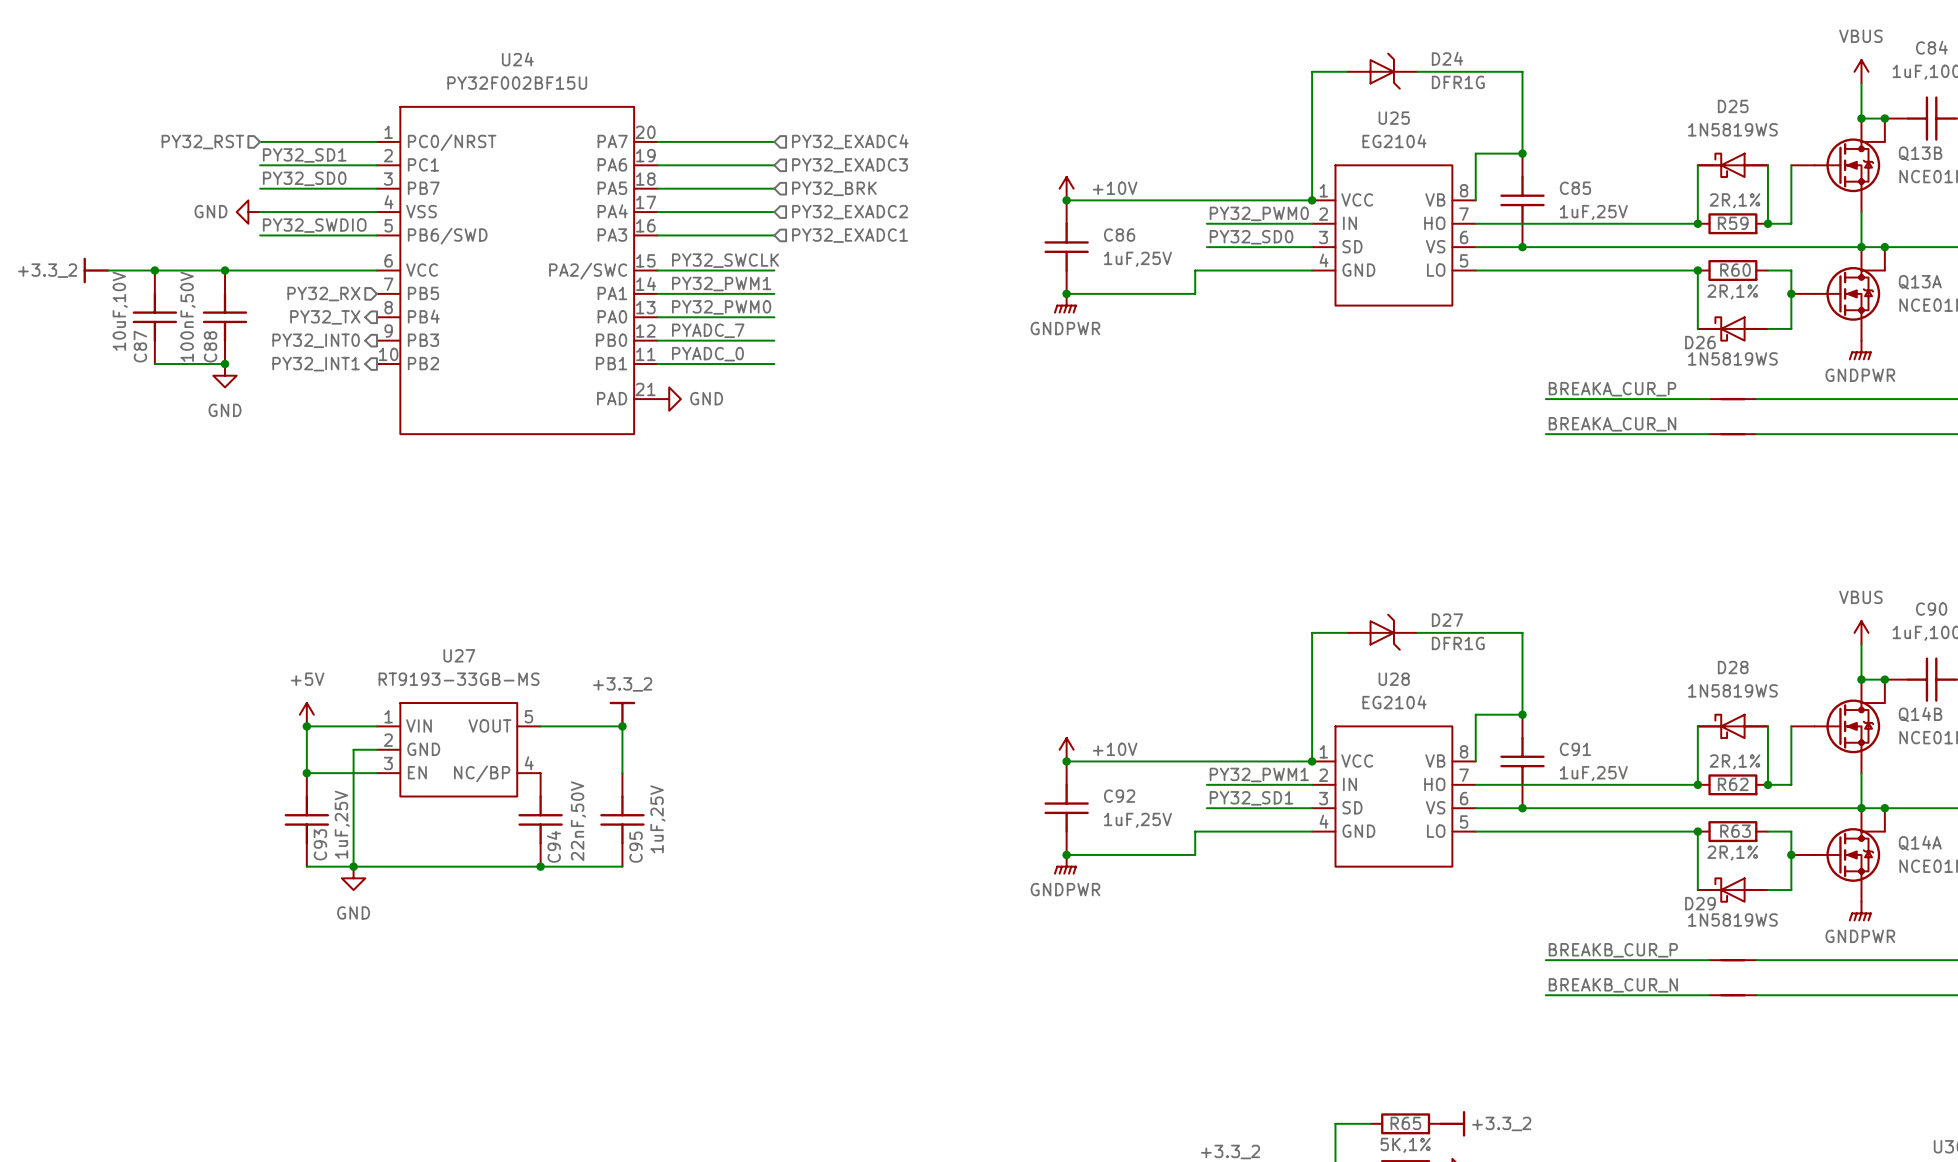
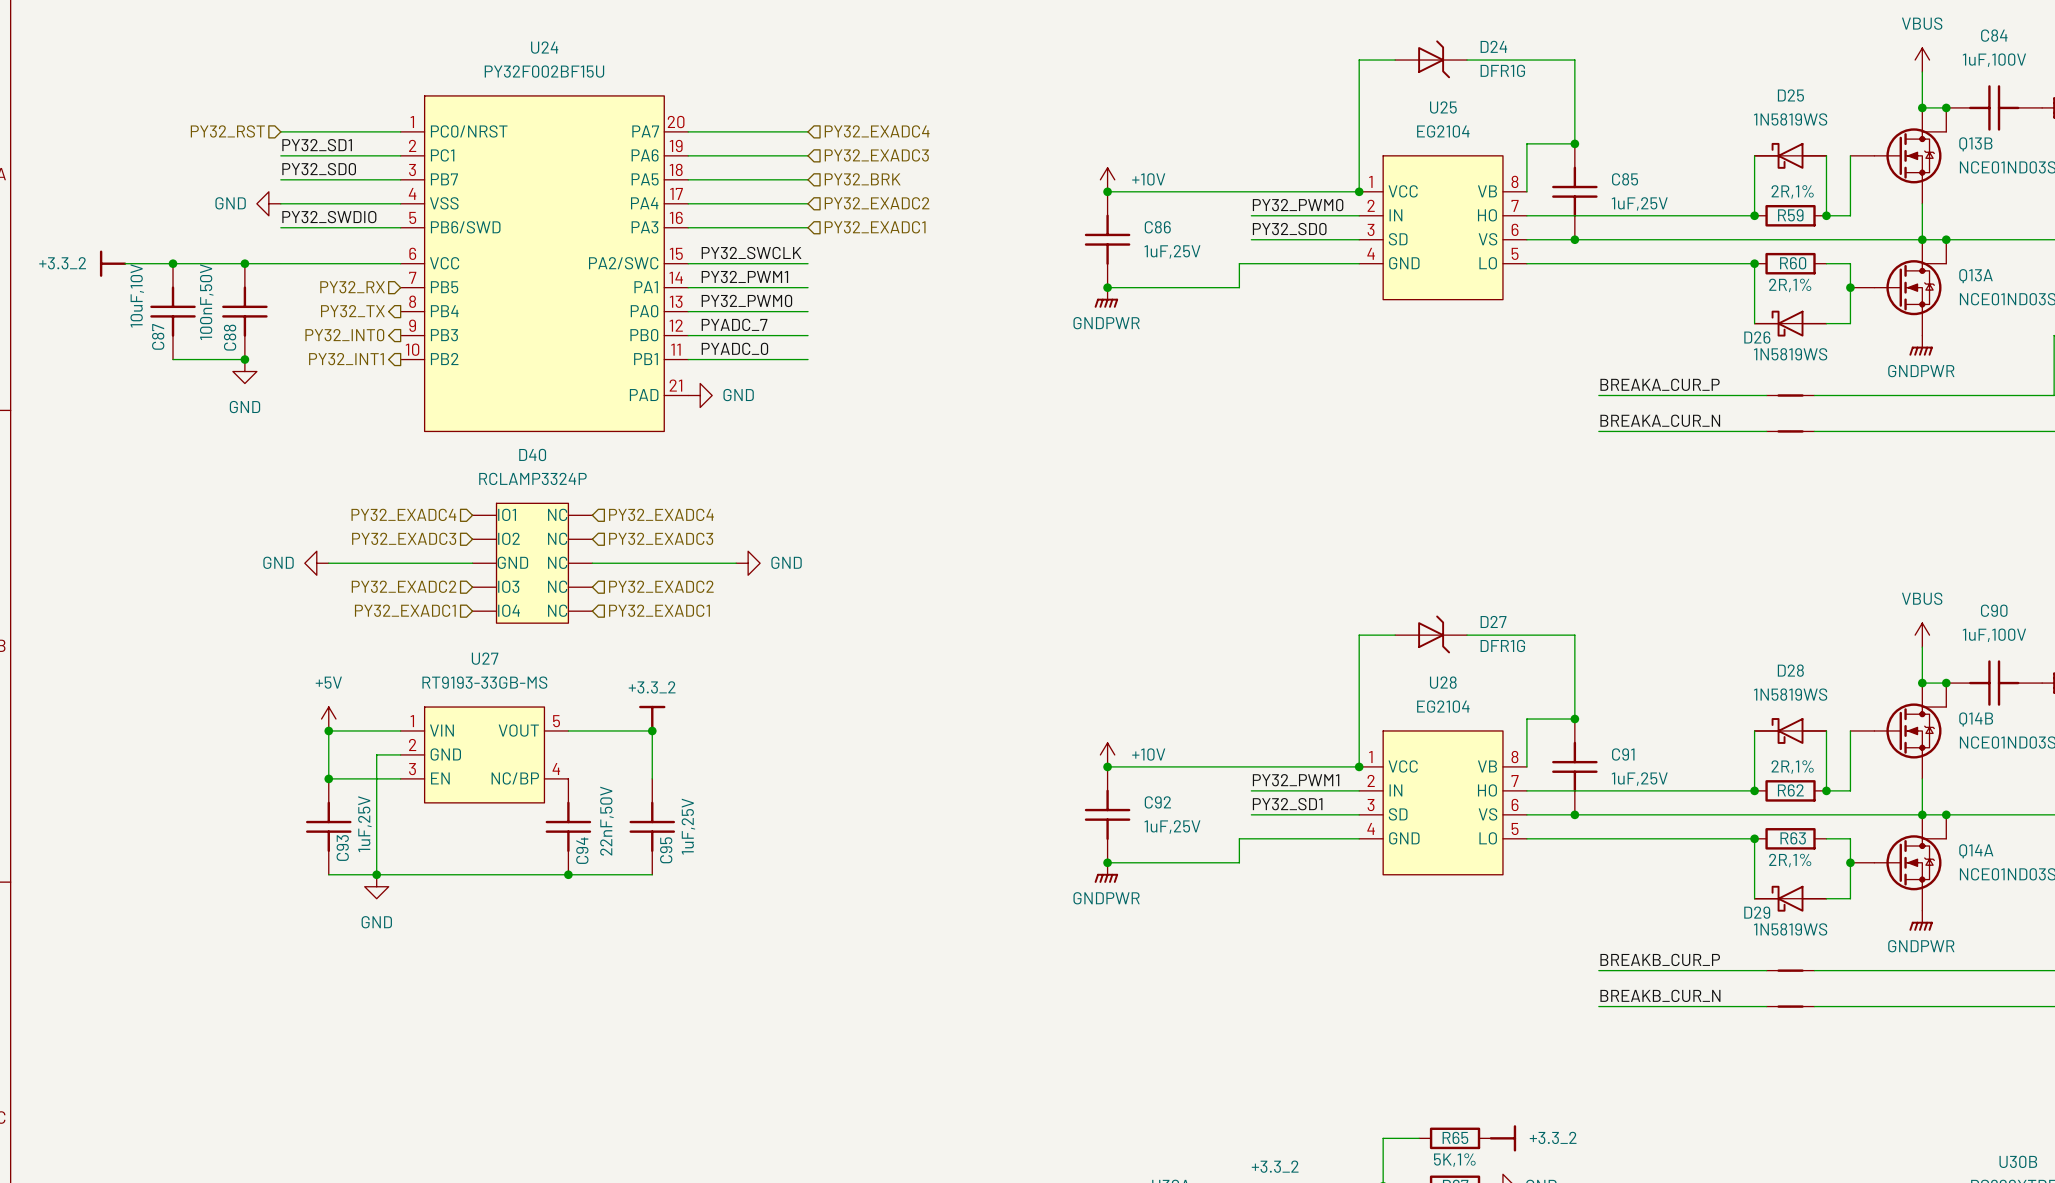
hierarchical label: none -> PY32_EXADC4 (403, 514)
hierarchical label: none -> PY32_EXADC4 (661, 514)
hierarchical label: none -> PY32_EXADC3 (404, 538)
hierarchical label: none -> PY32_EXADC3 (661, 538)
power symbol: none -> GND (316, 563)
wire: none -> (328, 563) (472, 563)
D40: none -> RCLAMP3324P (532, 563)
wire: none -> (592, 563) (736, 563)
power symbol: none -> GND (748, 563)
hierarchical label: none -> PY32_EXADC2 (404, 586)
hierarchical label: none -> PY32_EXADC2 (661, 586)
hierarchical label: none -> PY32_EXADC1 (405, 610)
hierarchical label: none -> PY32_EXADC1 (659, 610)

